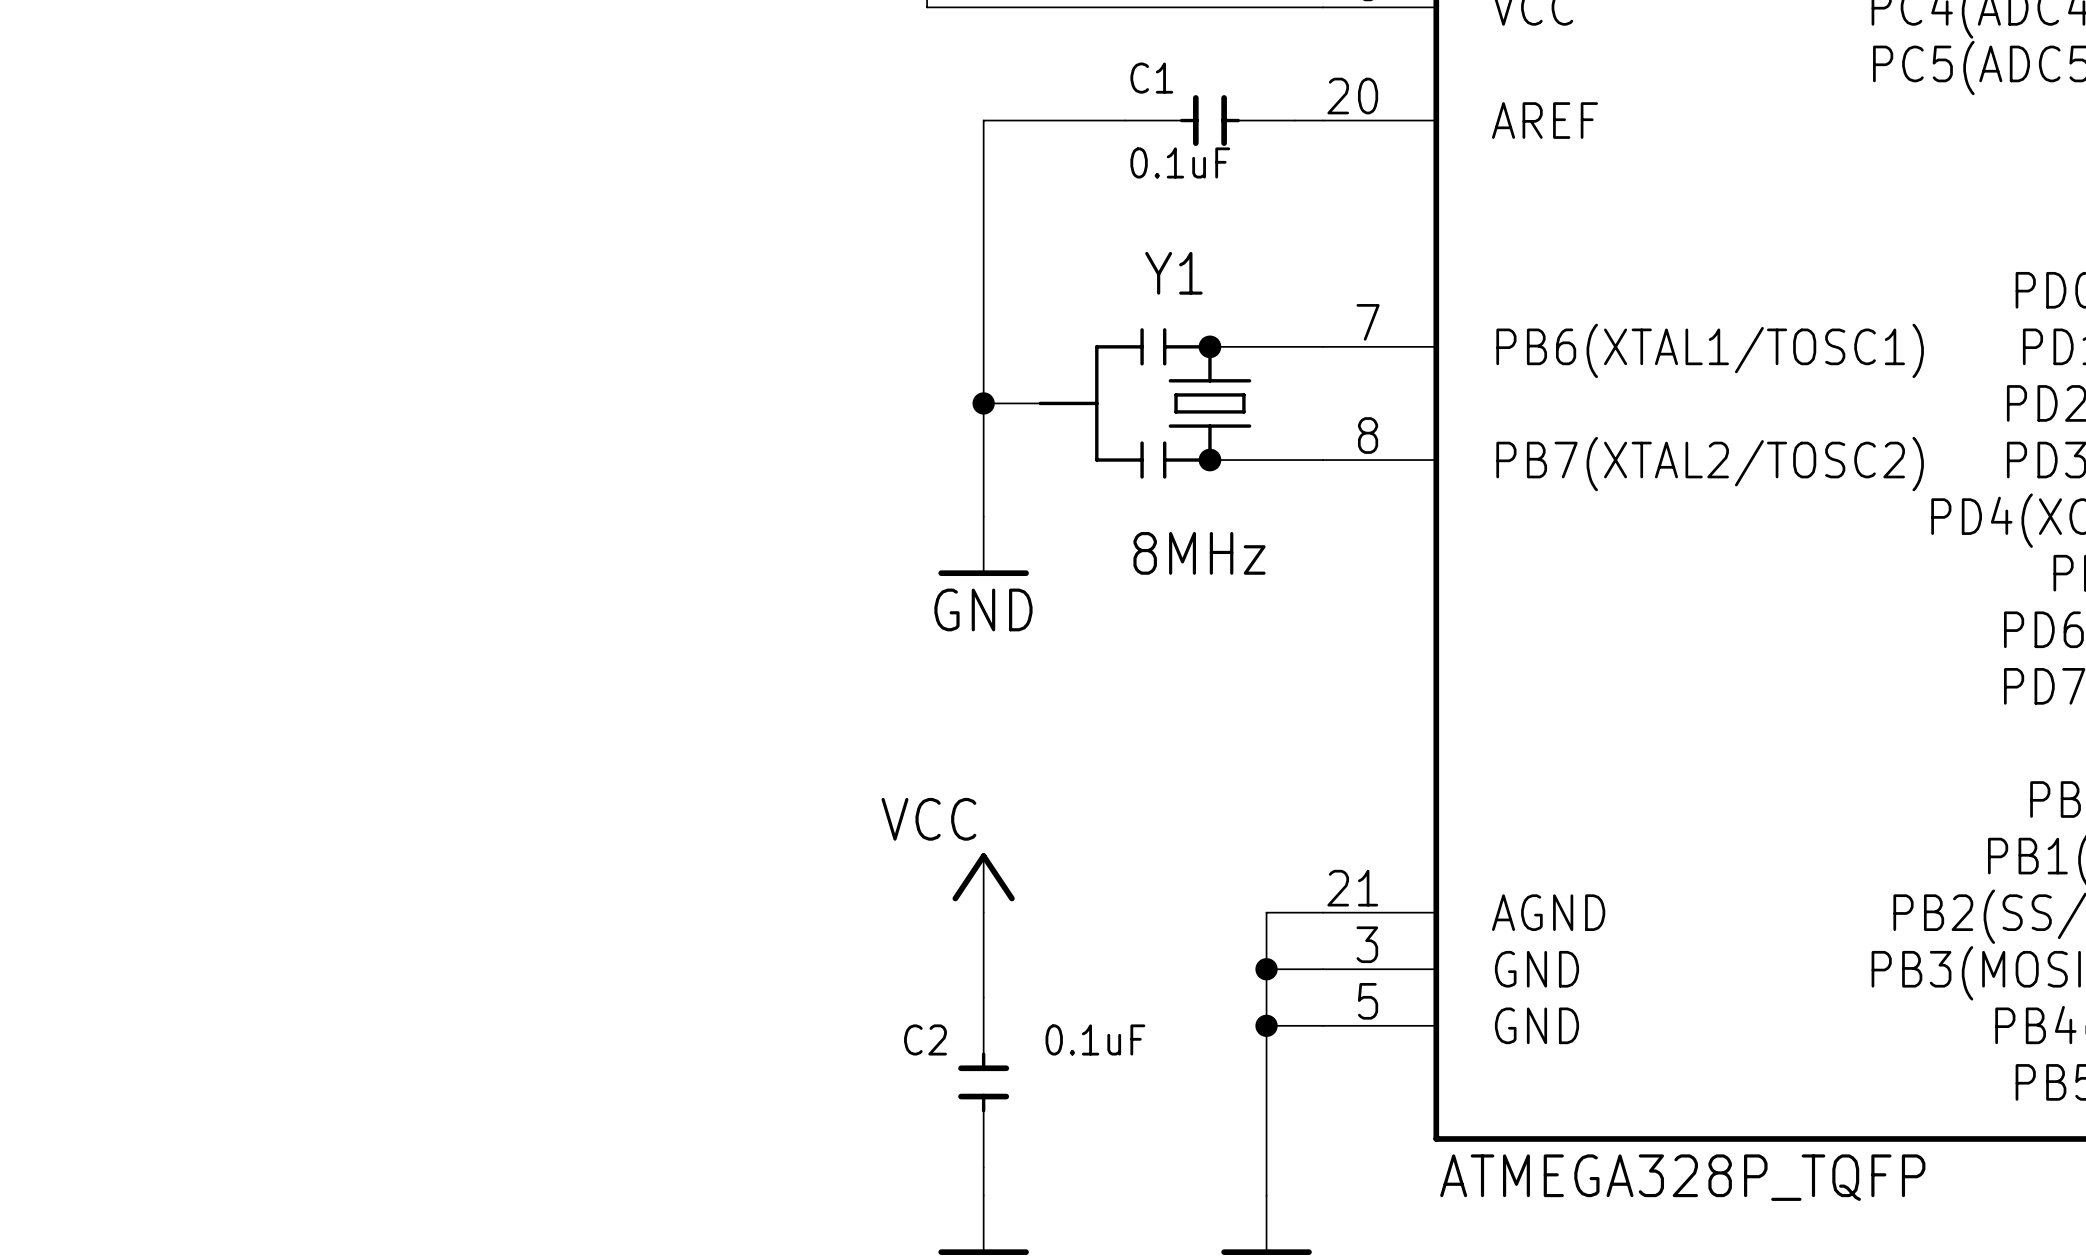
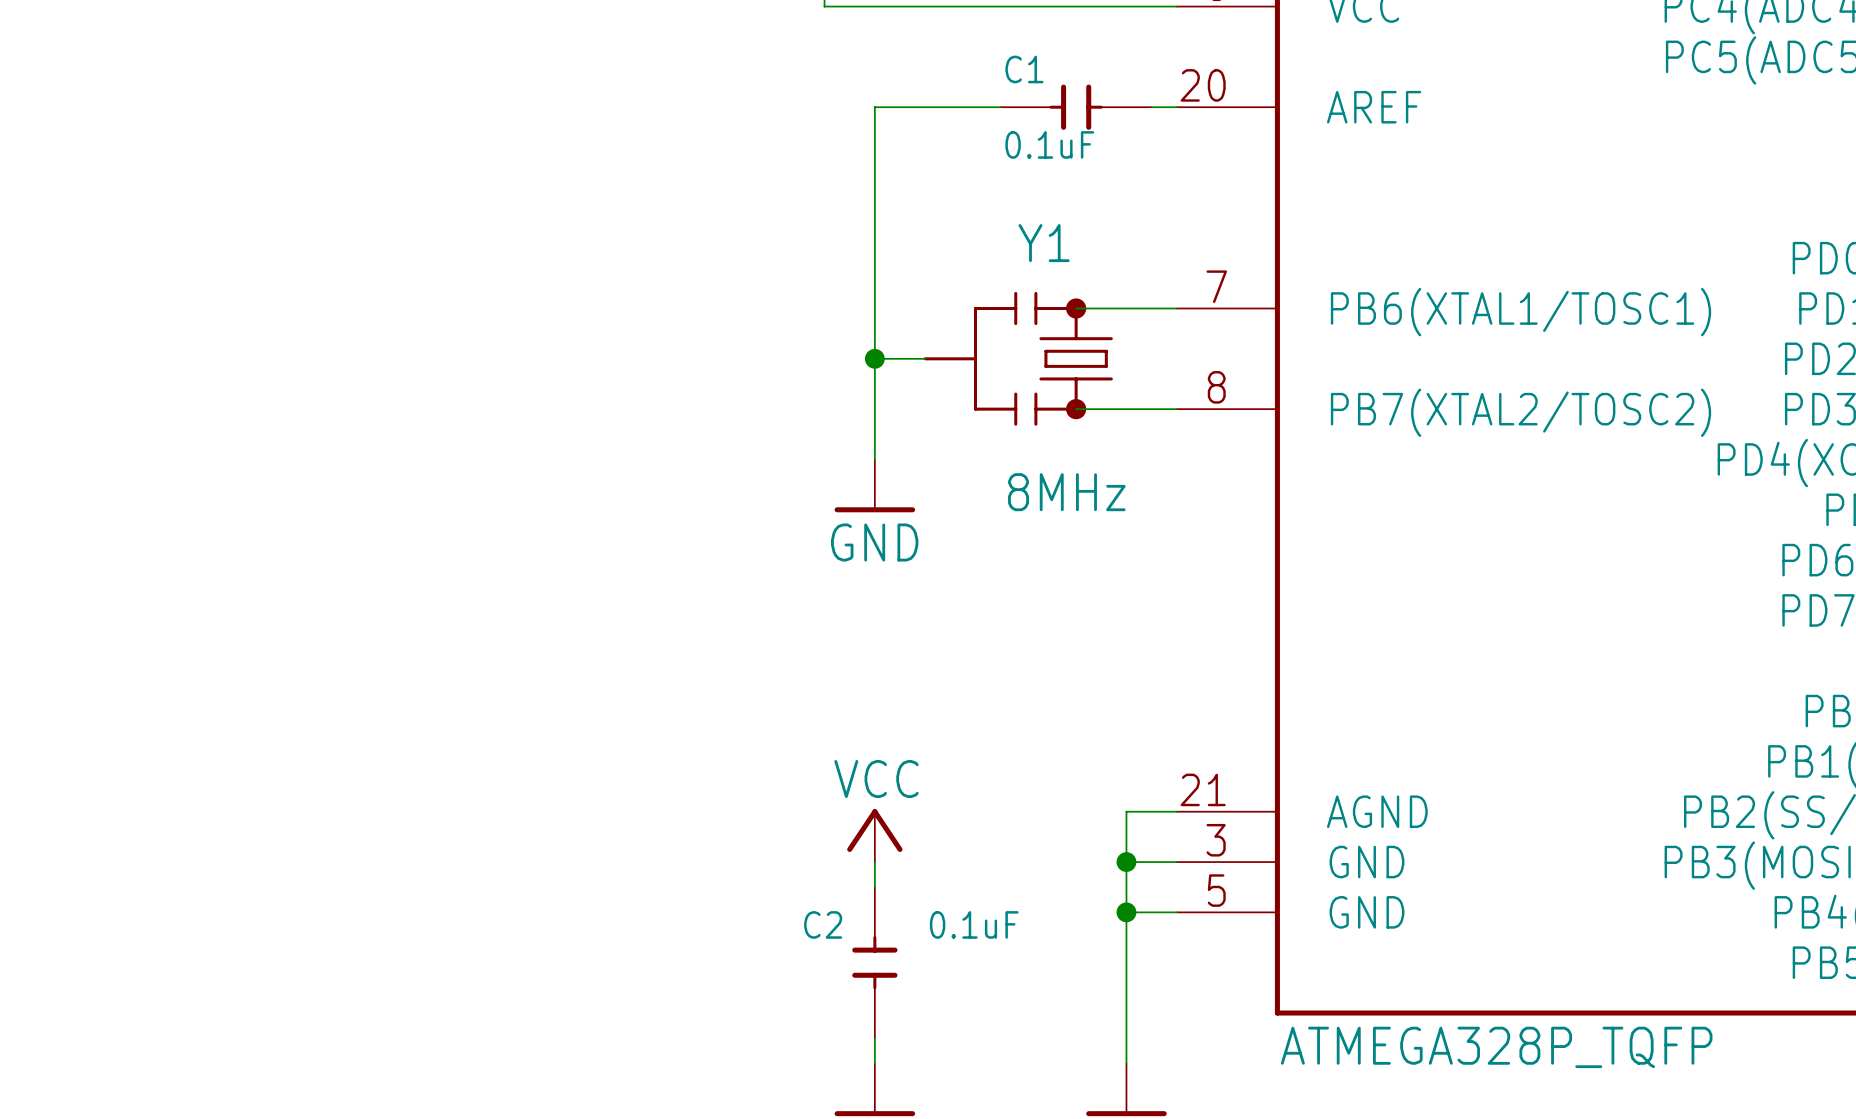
power symbol text position: VCC (928, 819) -> VCC (876, 779)
power symbol position: VCC (983, 882) -> VCC (874, 835)

